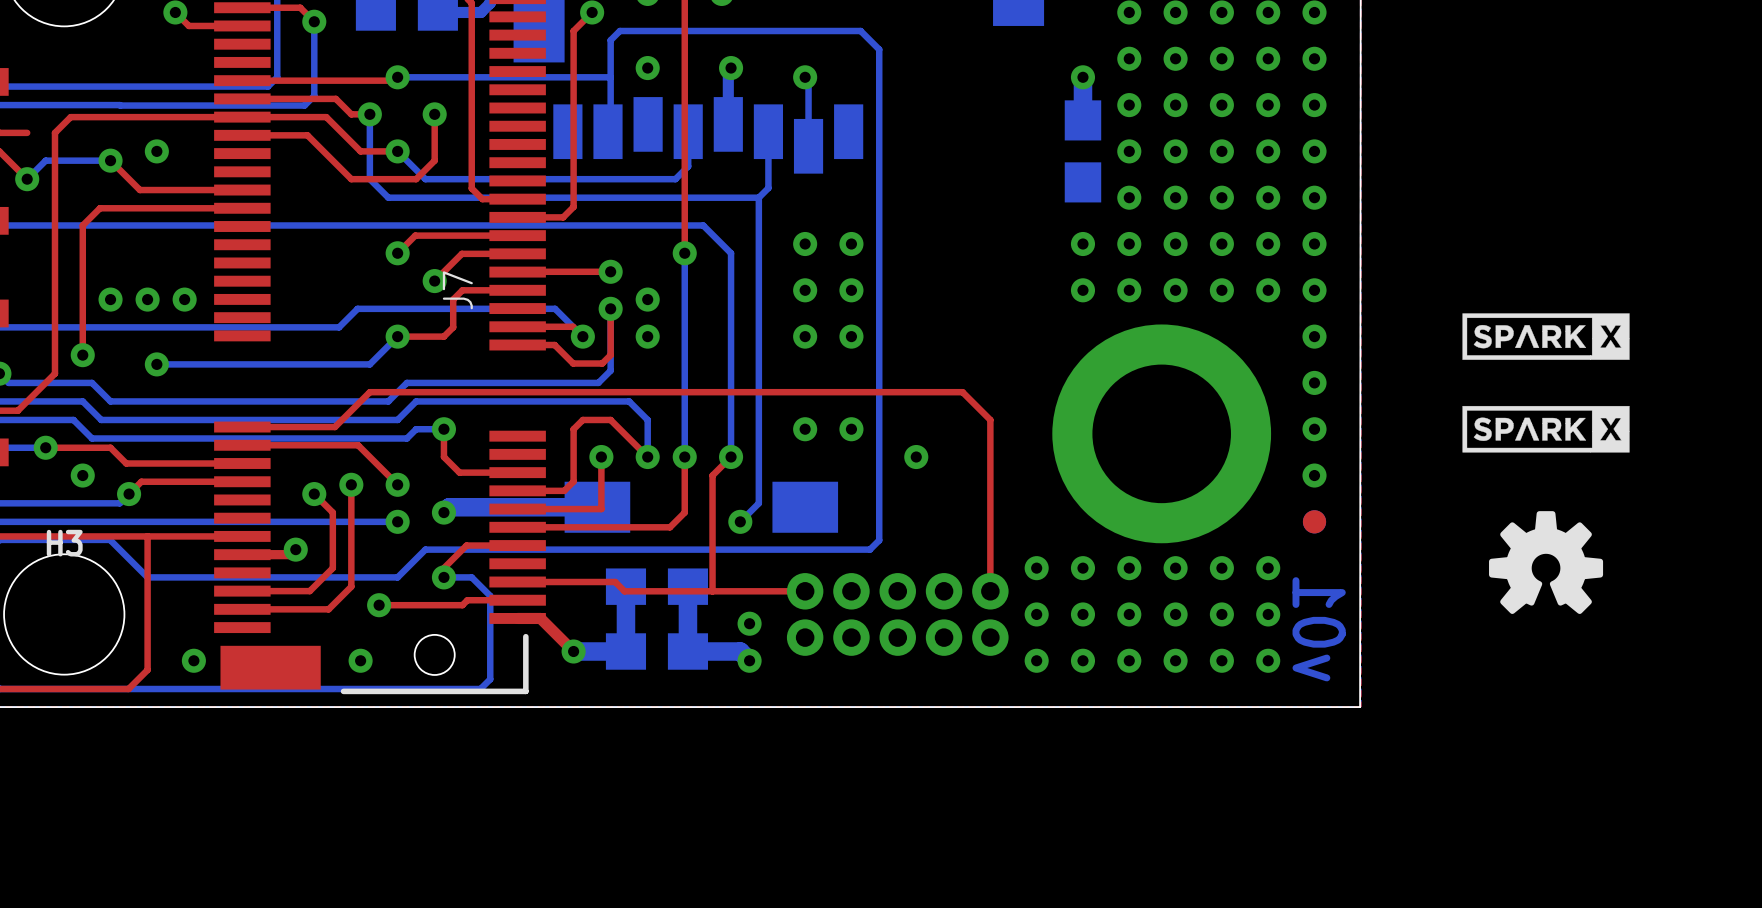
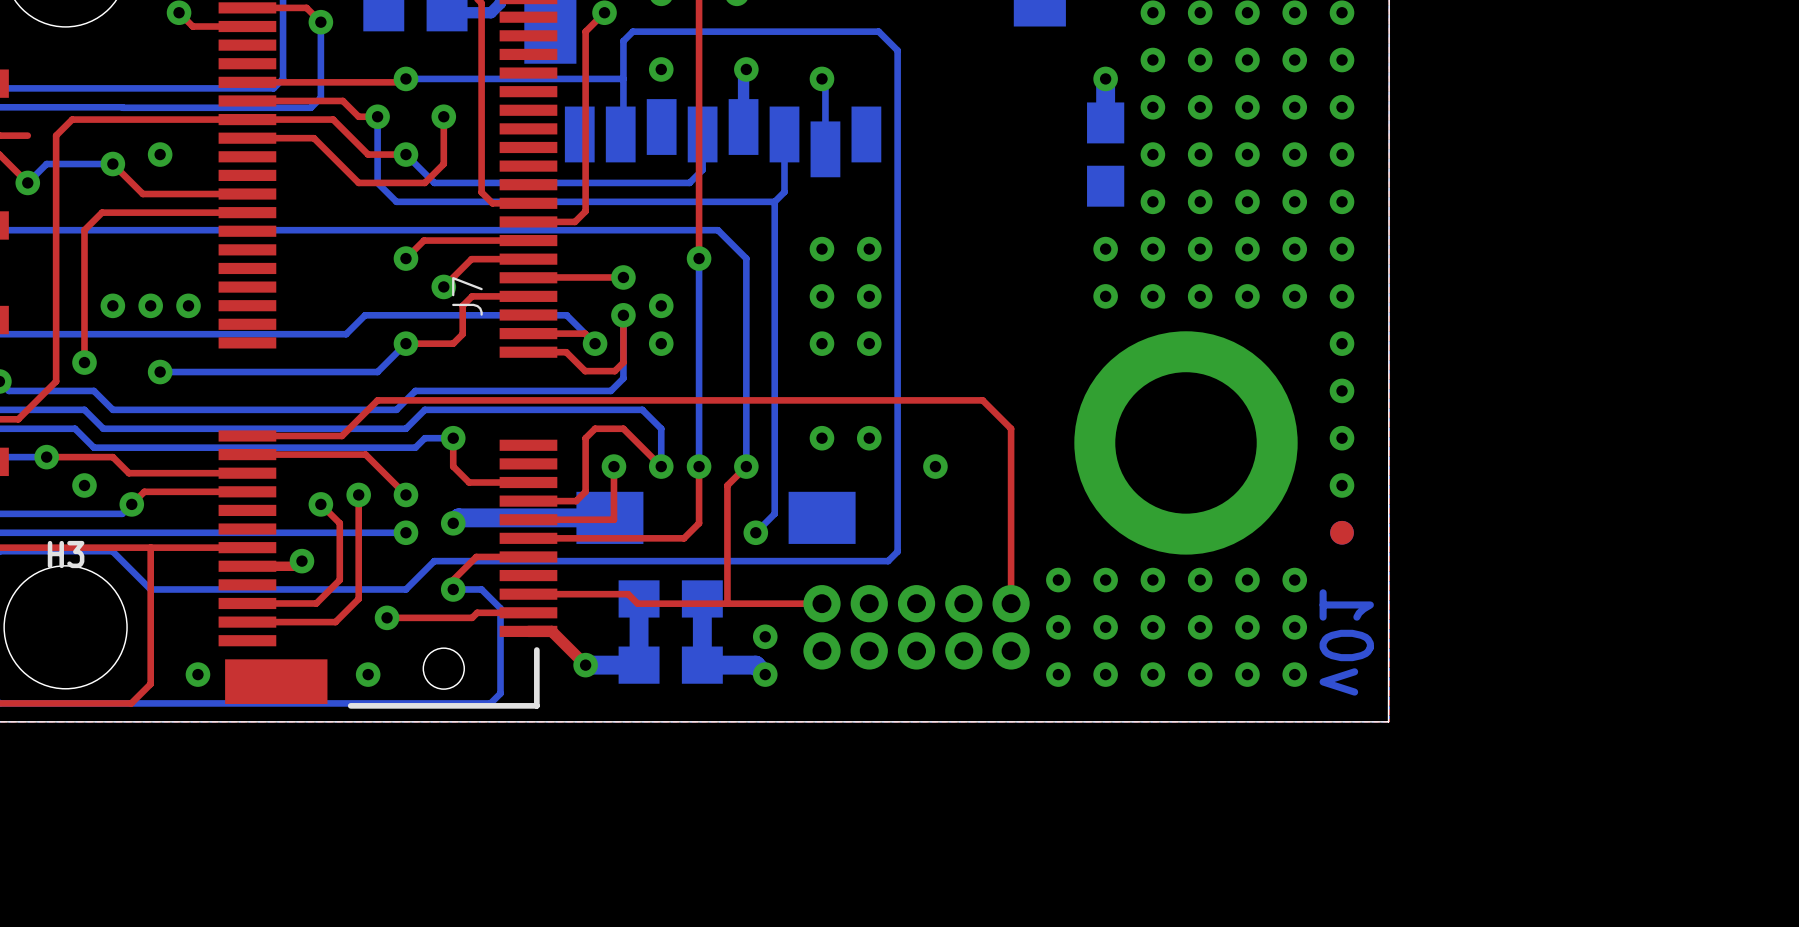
drawing: [1462, 313, 1630, 360] -> none
drawing: [1462, 405, 1630, 453] -> none
drawing: [1489, 511, 1604, 614] -> none

